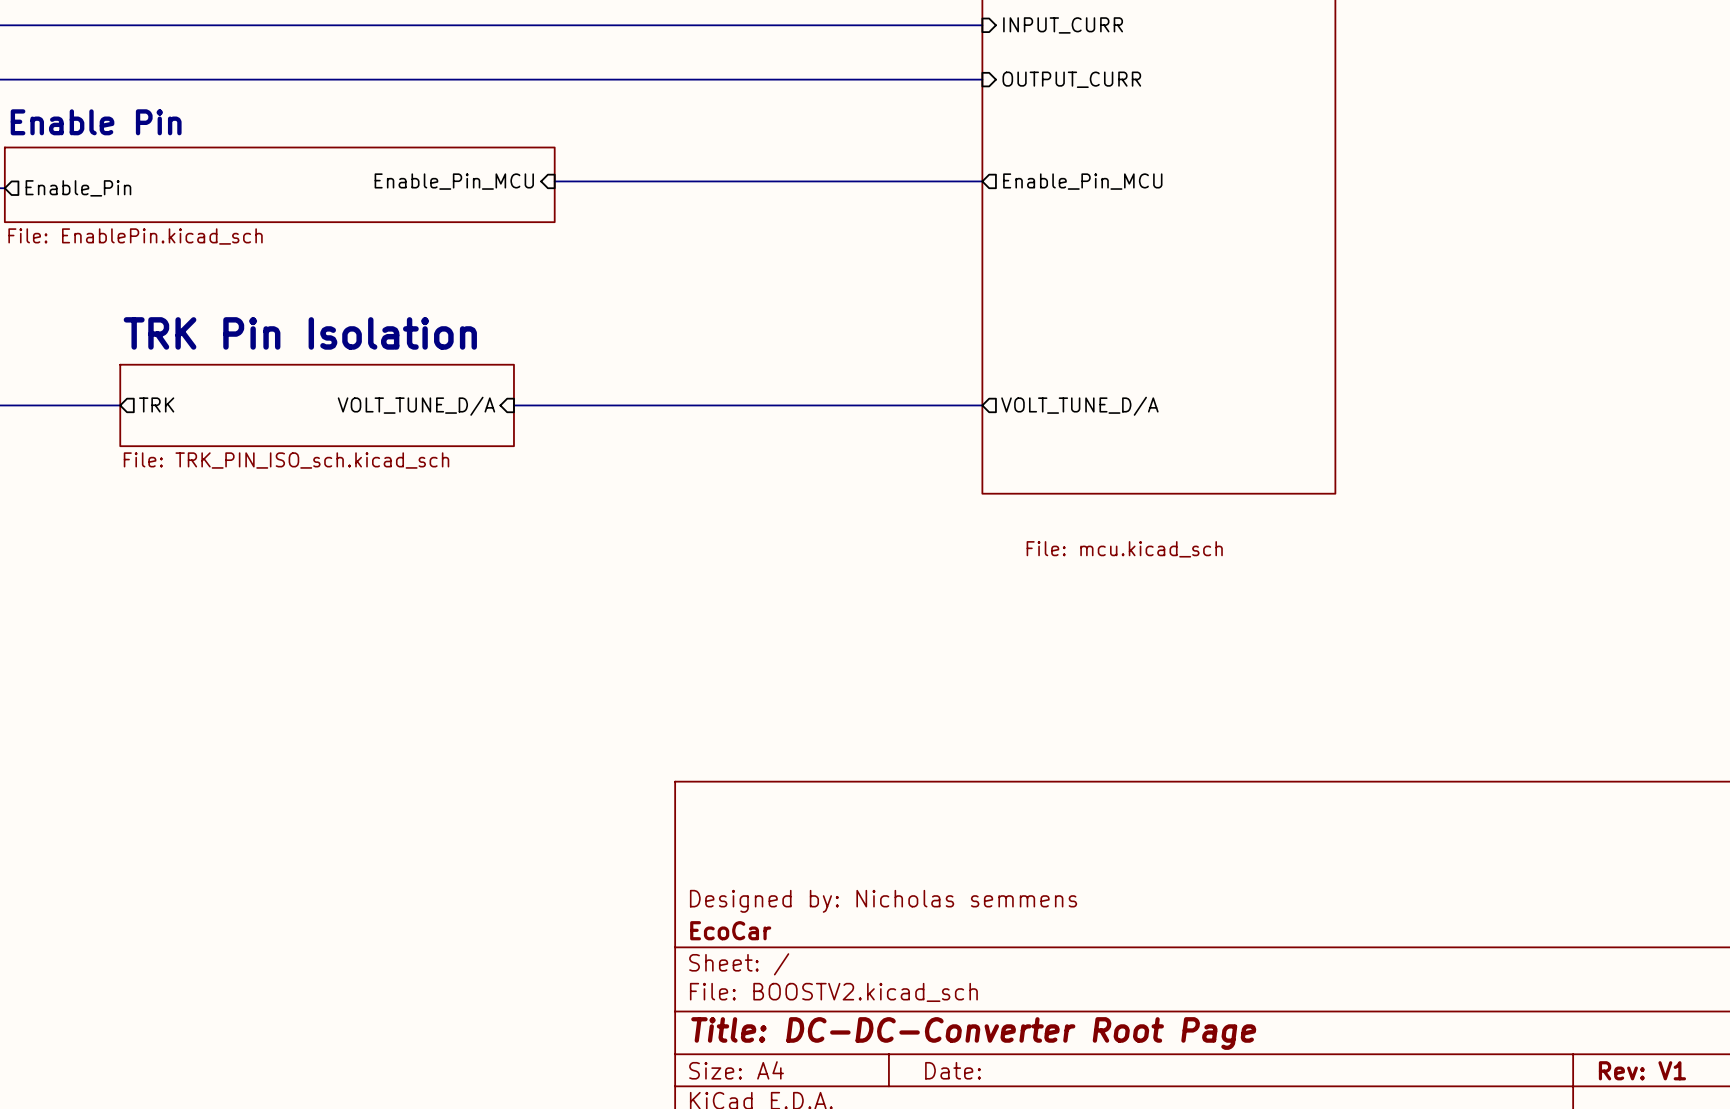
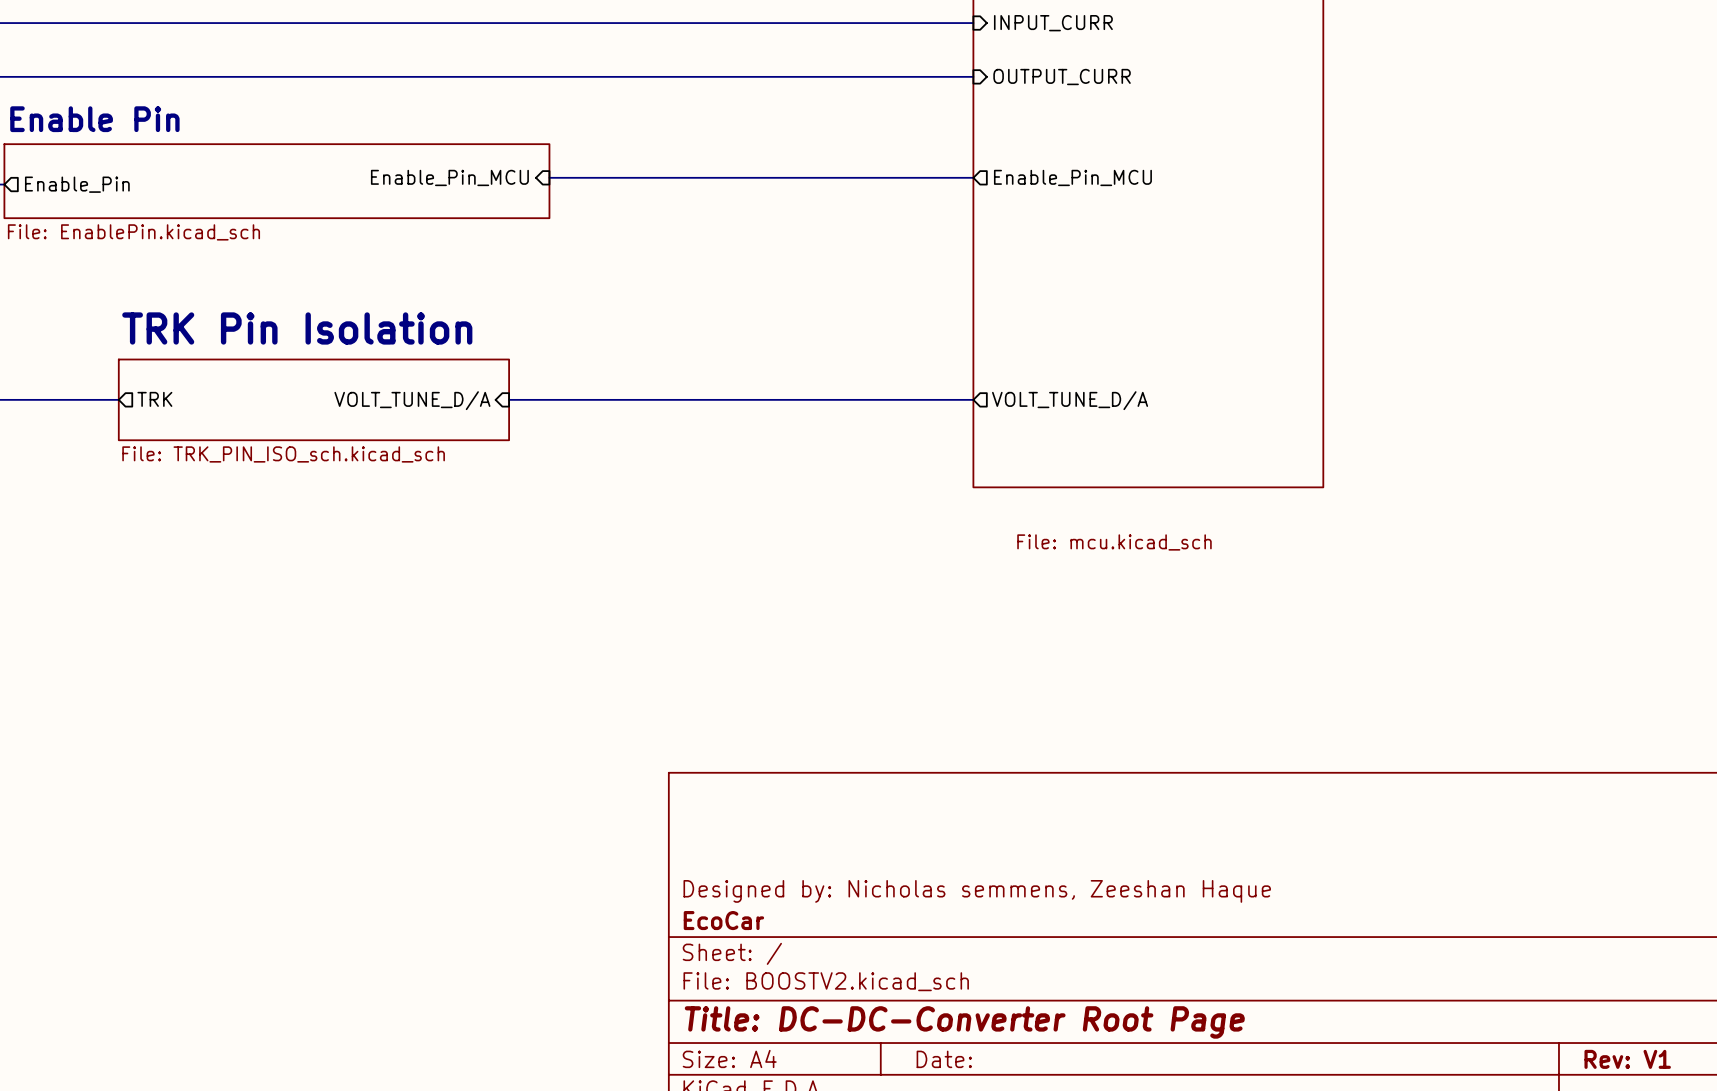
title block: Designed by: Nicholas semmens (883, 901) -> Designed by: Nicholas semmens, Zeeshan Haque (977, 891)

